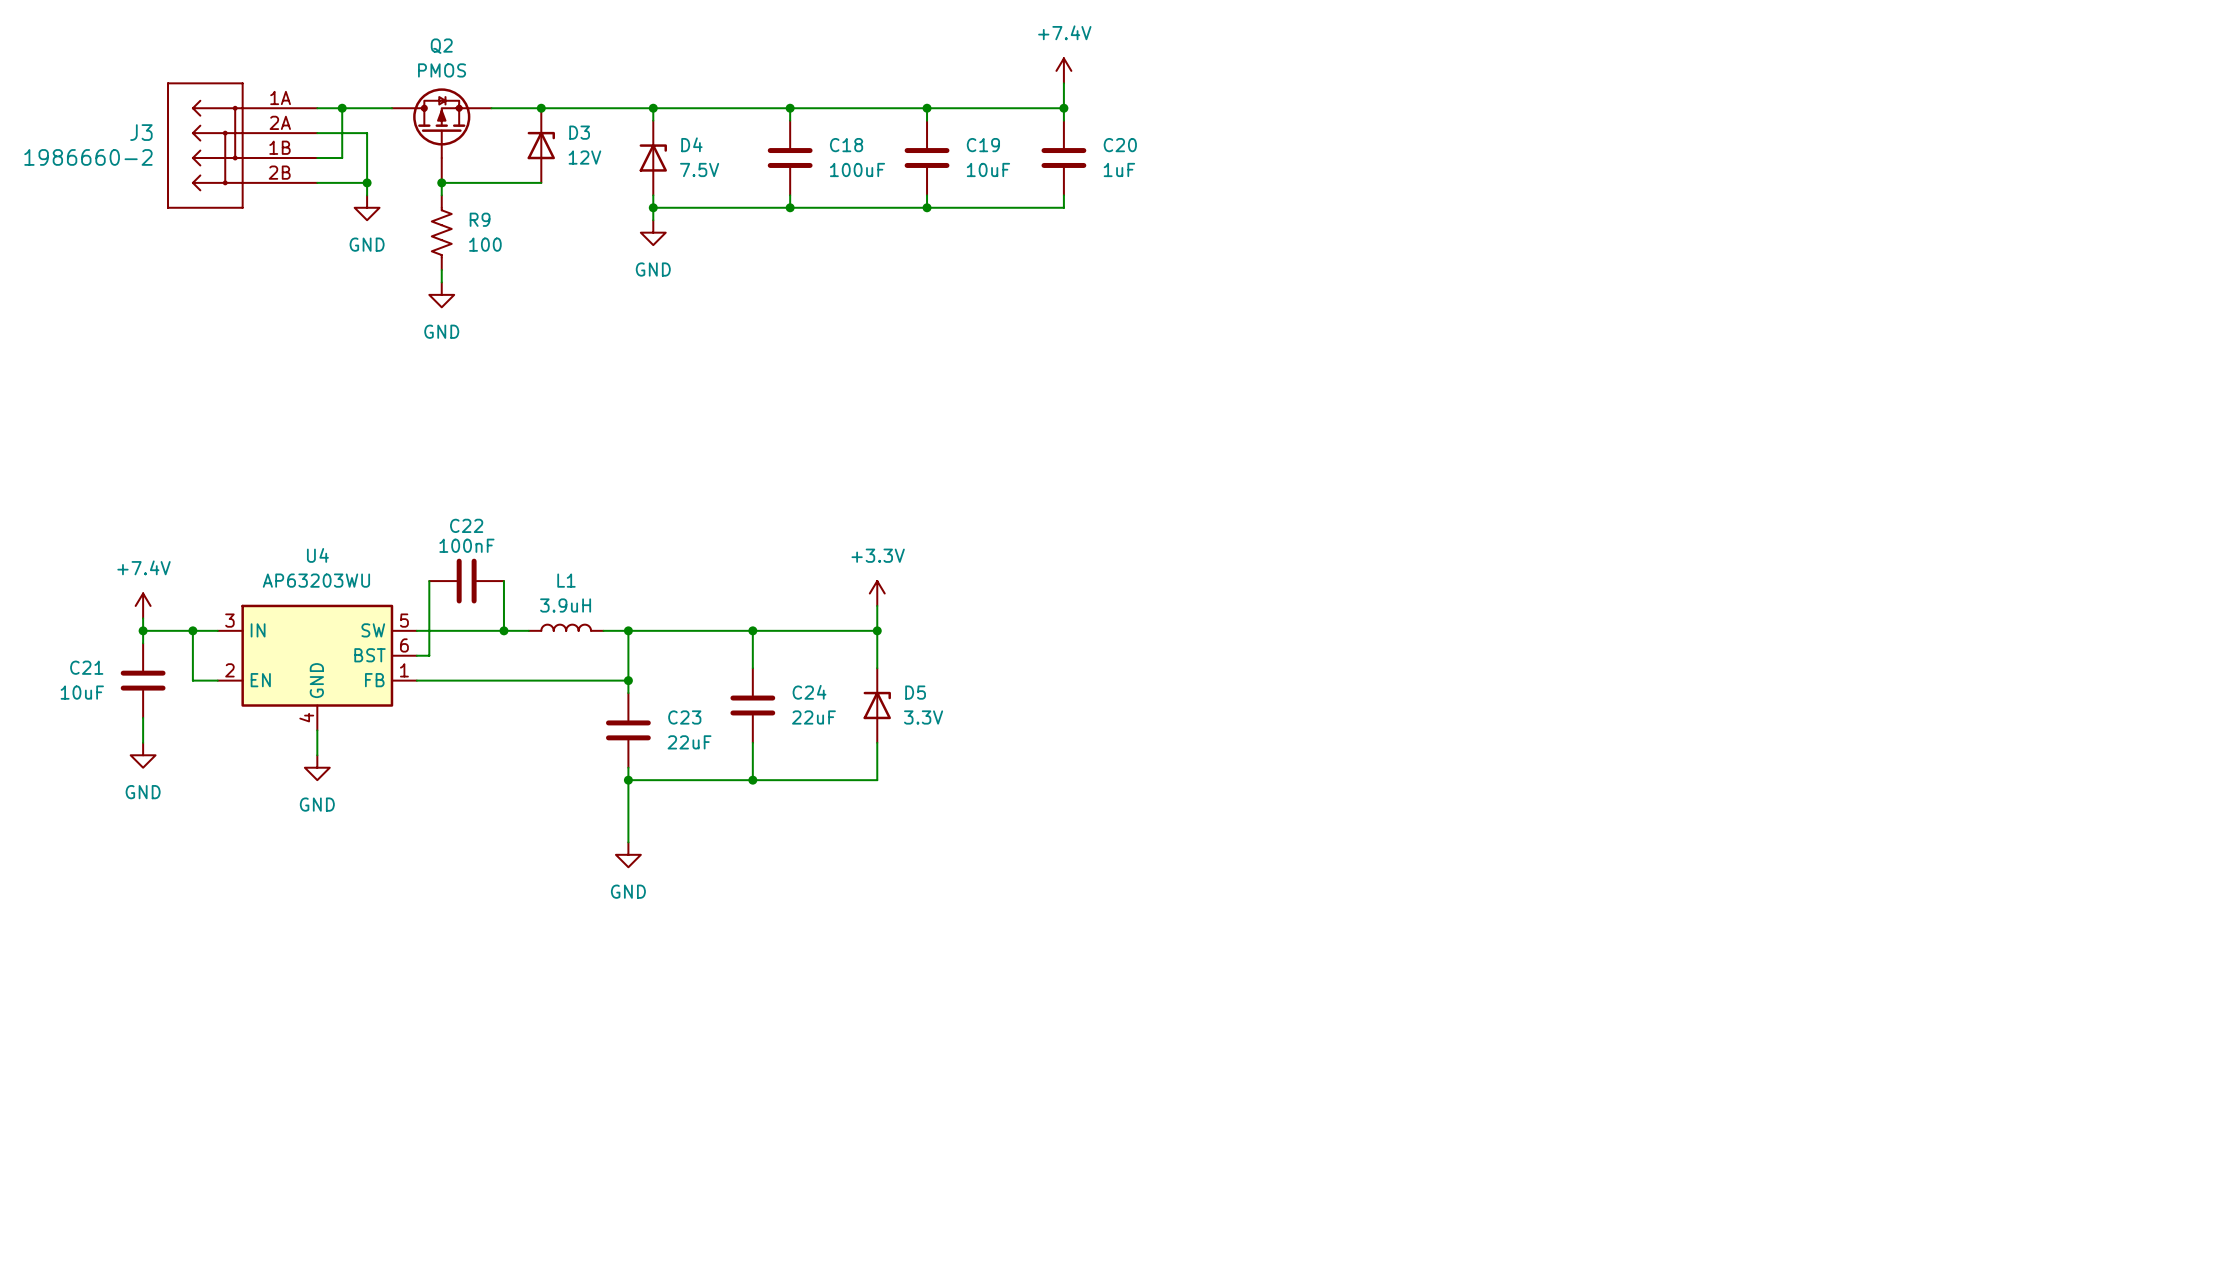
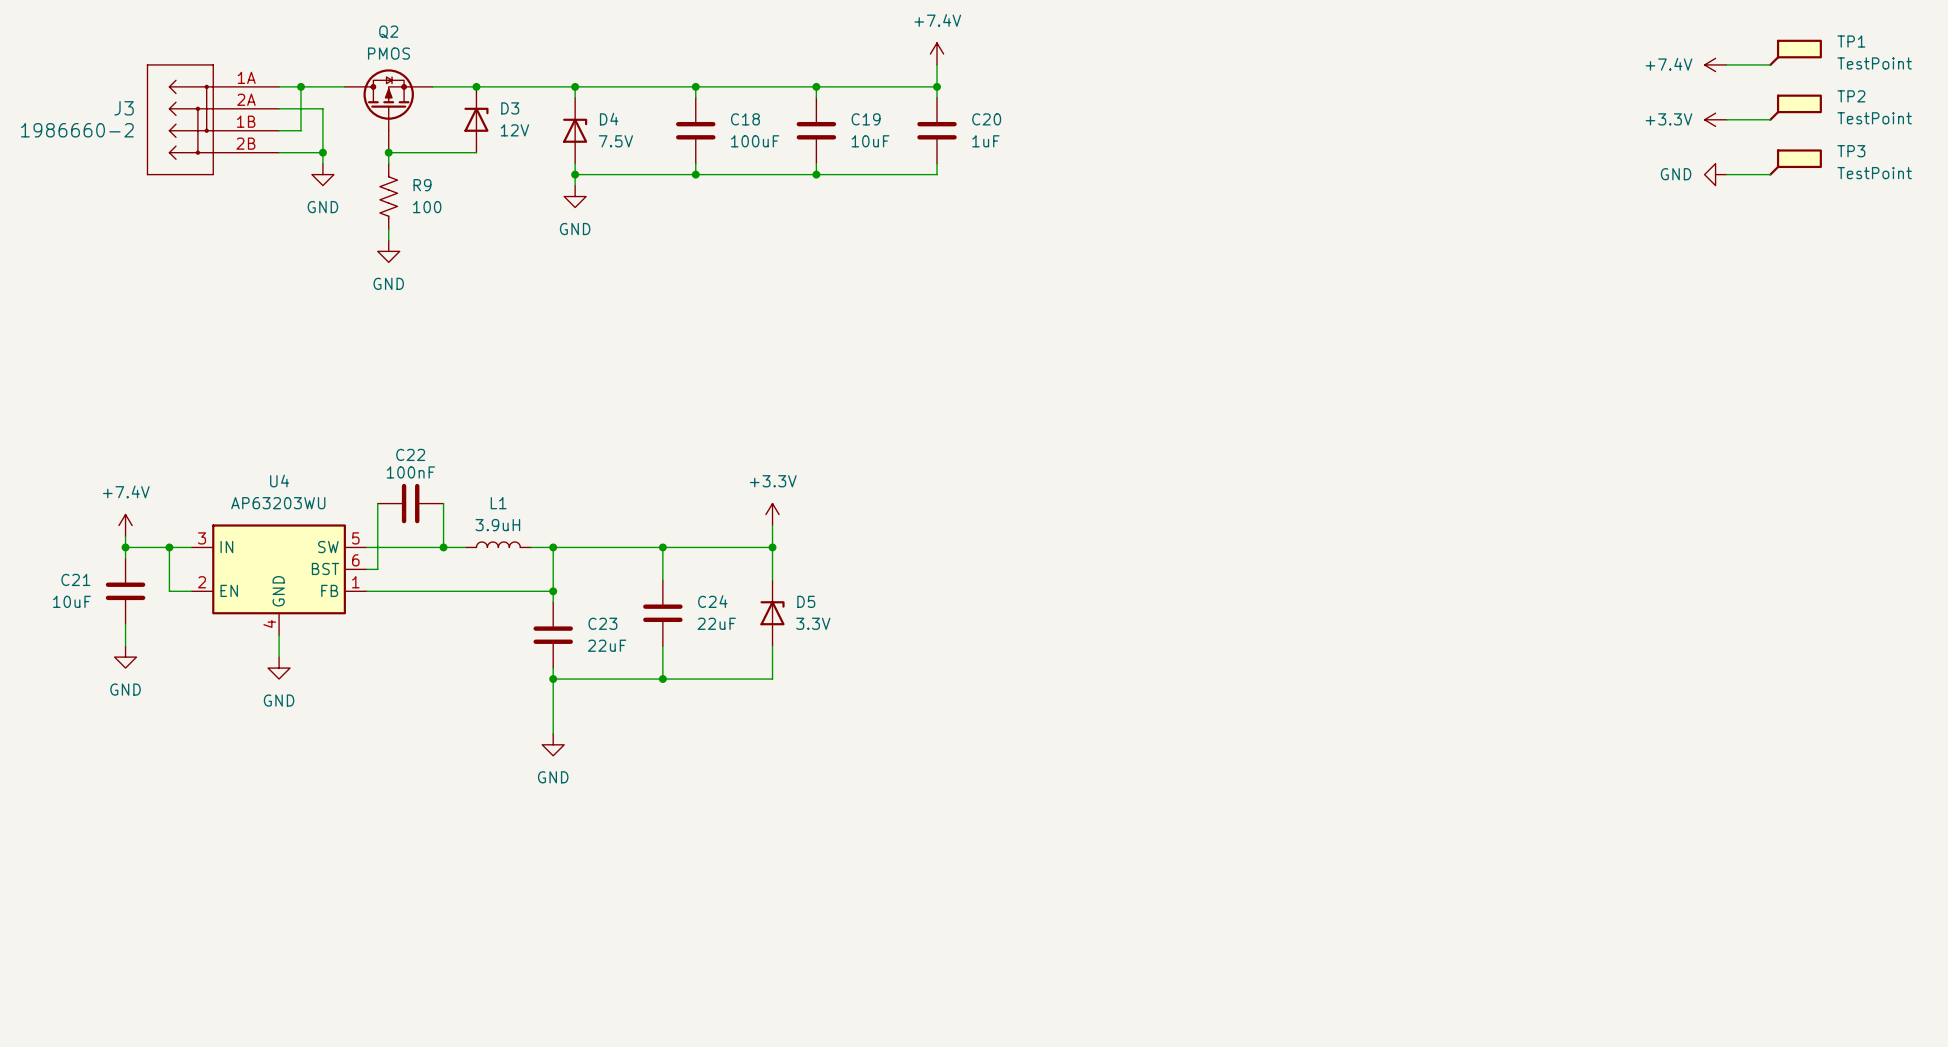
TP1: none -> TestPoint (1795, 52)
power symbol: none -> +7.4V (1715, 64)
wire: none -> (1726, 64) (1770, 64)
TP2: none -> TestPoint (1795, 107)
power symbol: none -> +3.3V (1715, 119)
wire: none -> (1726, 119) (1770, 119)
TP3: none -> TestPoint (1795, 162)
power symbol: none -> GND (1715, 174)
wire: none -> (1726, 174) (1770, 174)

